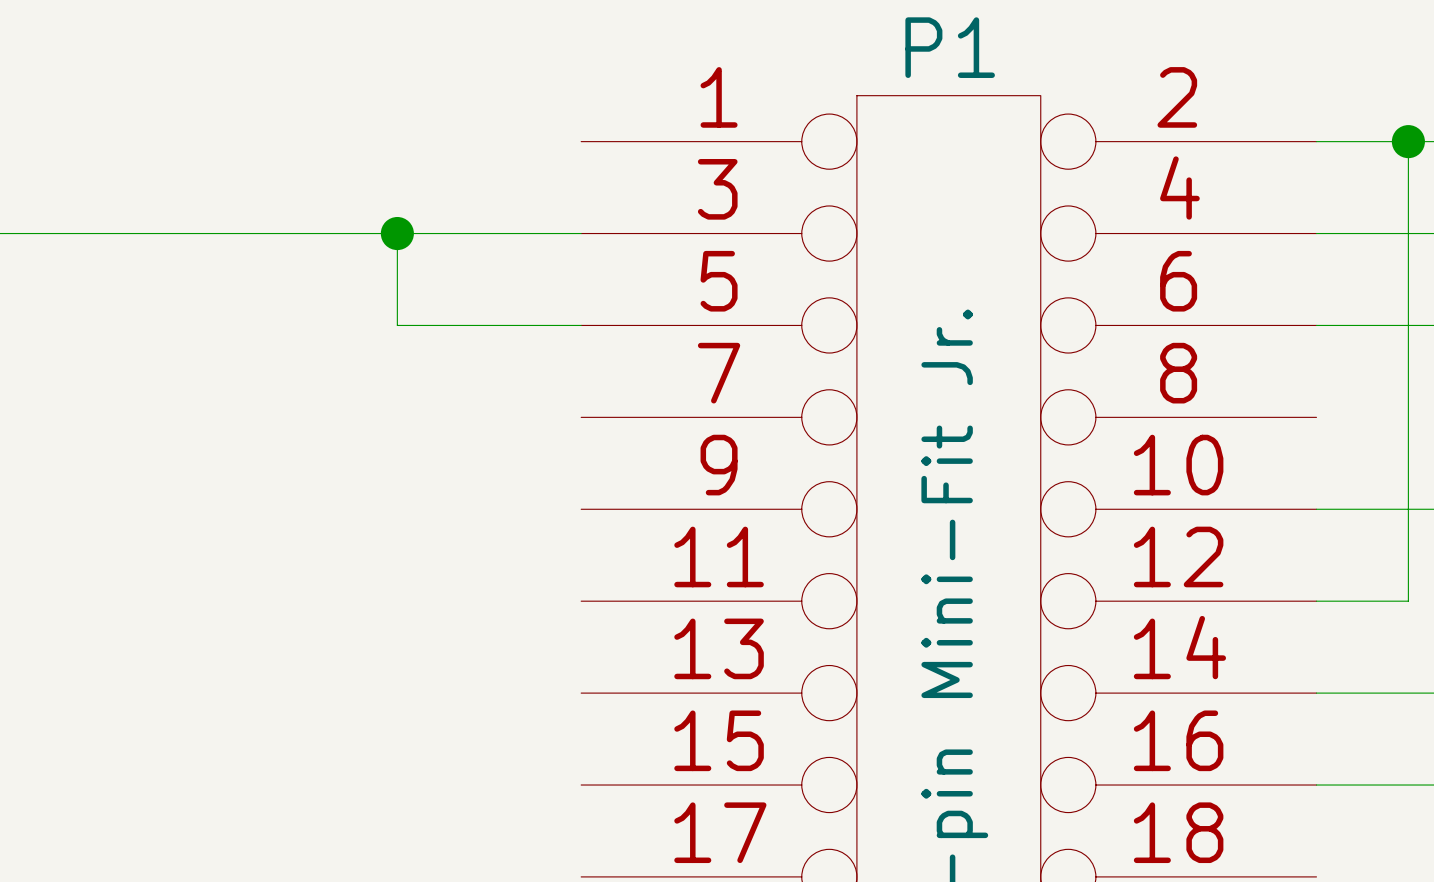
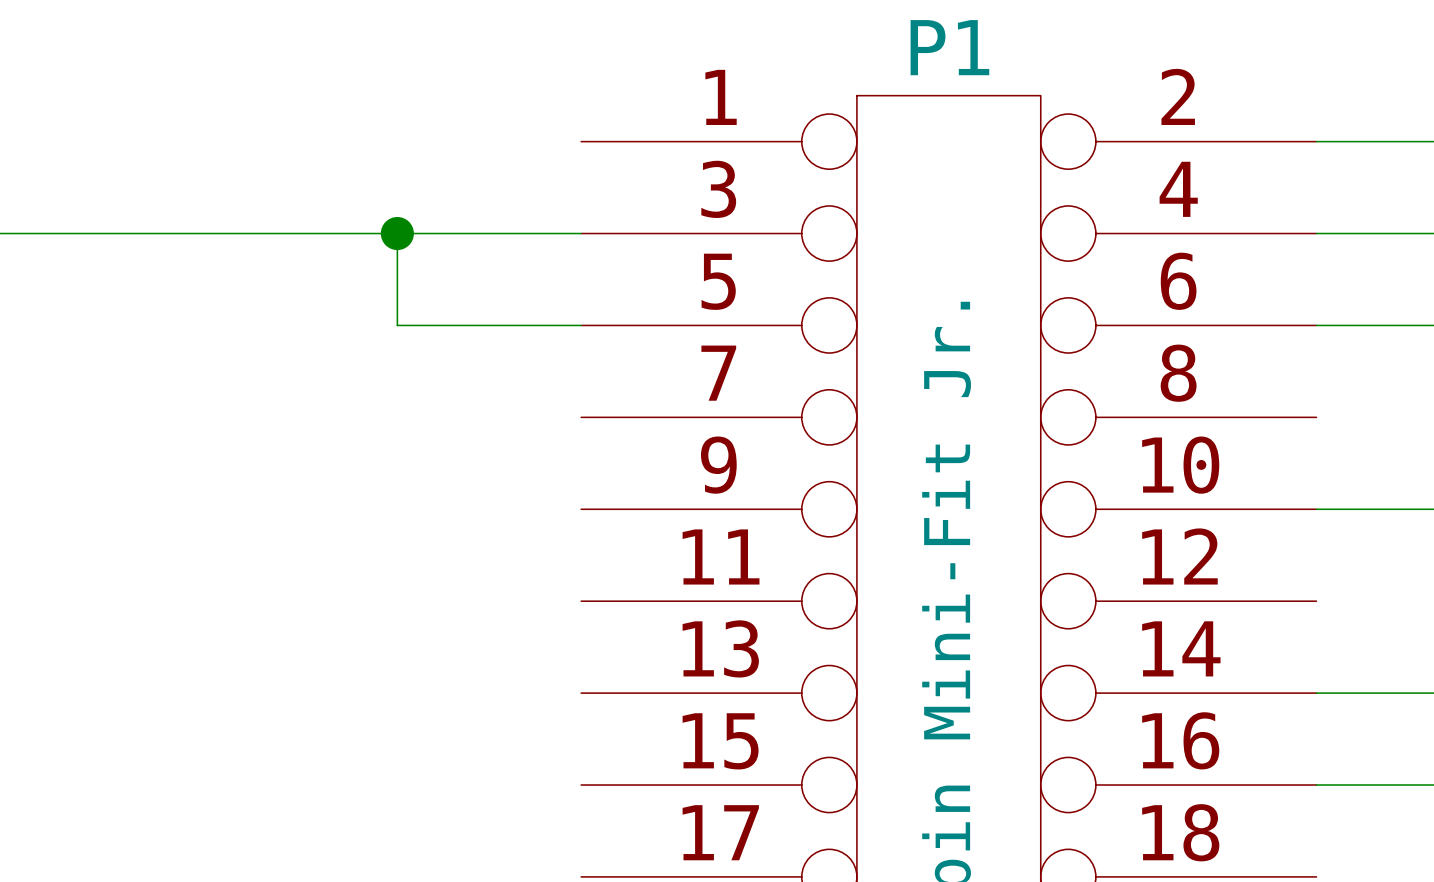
wire: (1408, 141) (1408, 601) (1316, 601) -> none
junction: (1408, 141) -> none

